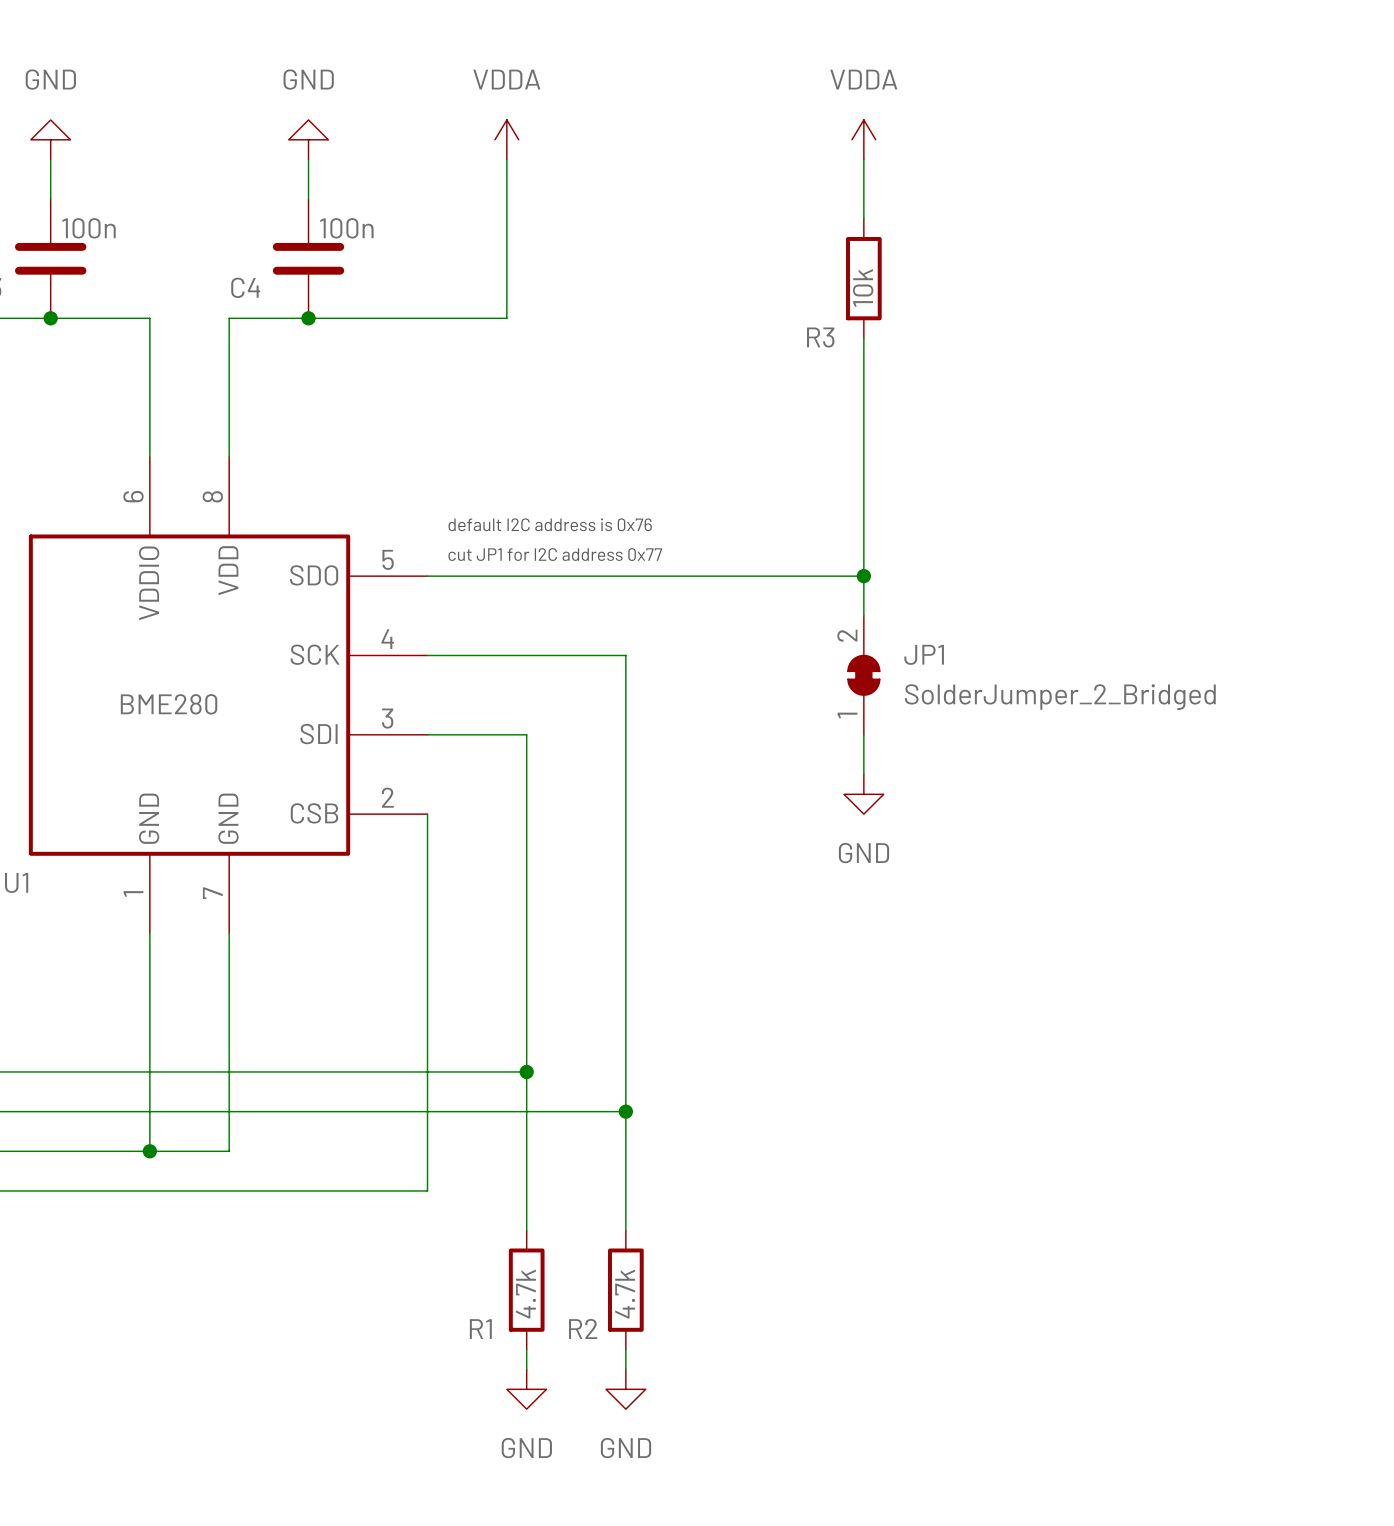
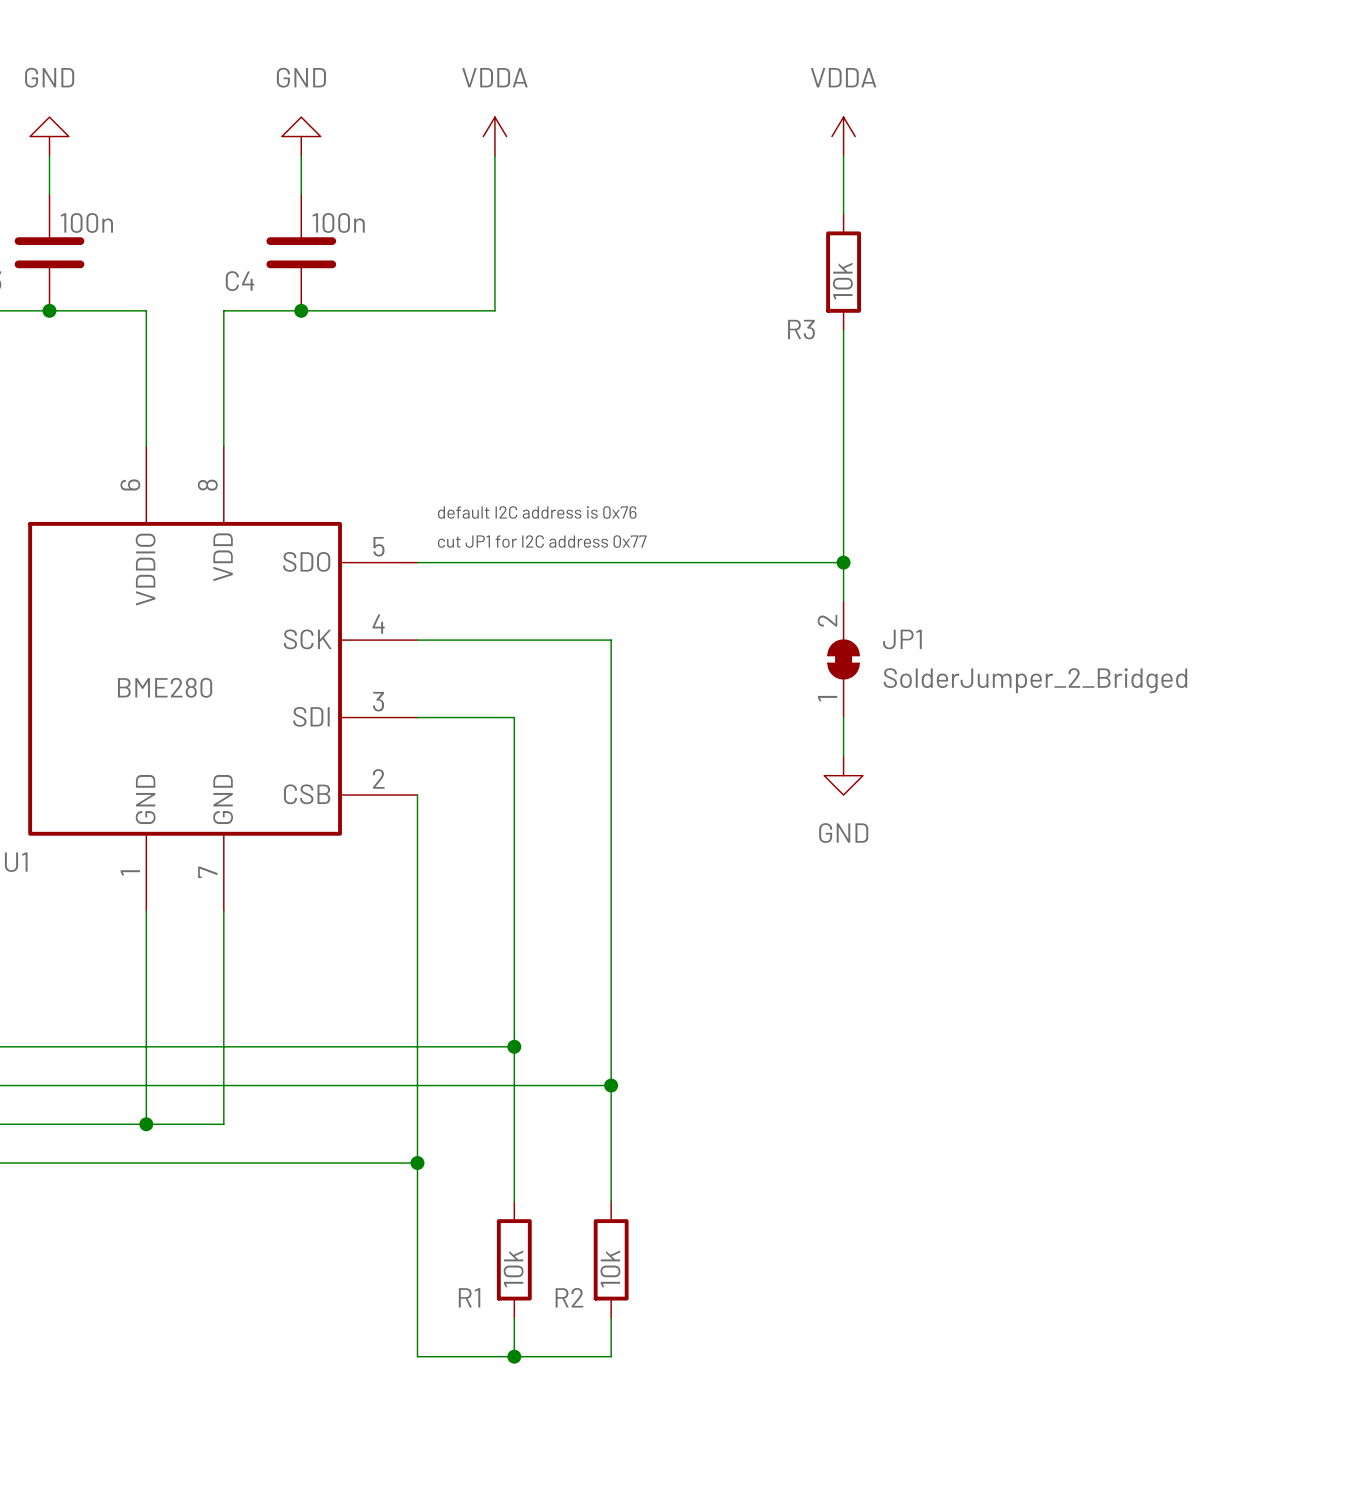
wire: none -> (417, 1163) (417, 1356) (611, 1356) (611, 1337)
junction: none -> (417, 1163)
R1 value: 4.7k (525, 1294) -> 10k (513, 1268)
R2 value: 4.7k (625, 1294) -> 10k (610, 1268)
power symbol: GND (526, 1389) -> none
junction: none -> (514, 1356)
power symbol: GND (625, 1389) -> none

